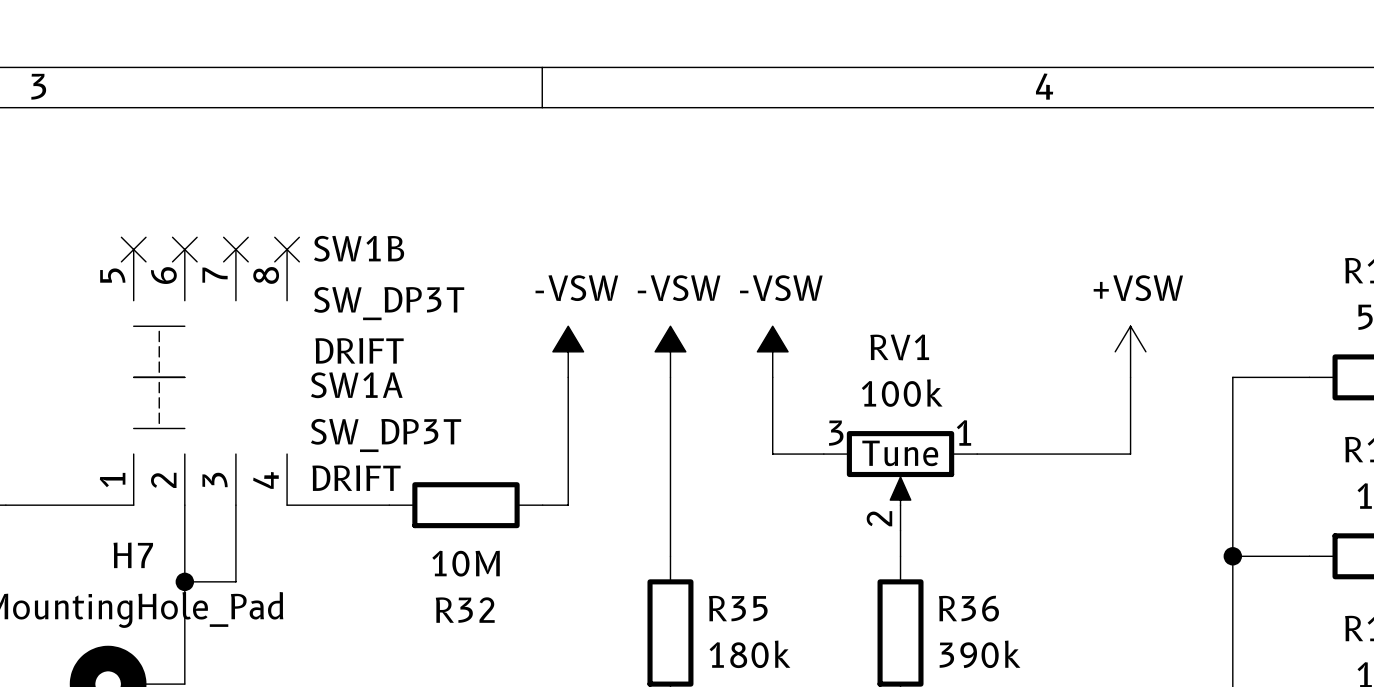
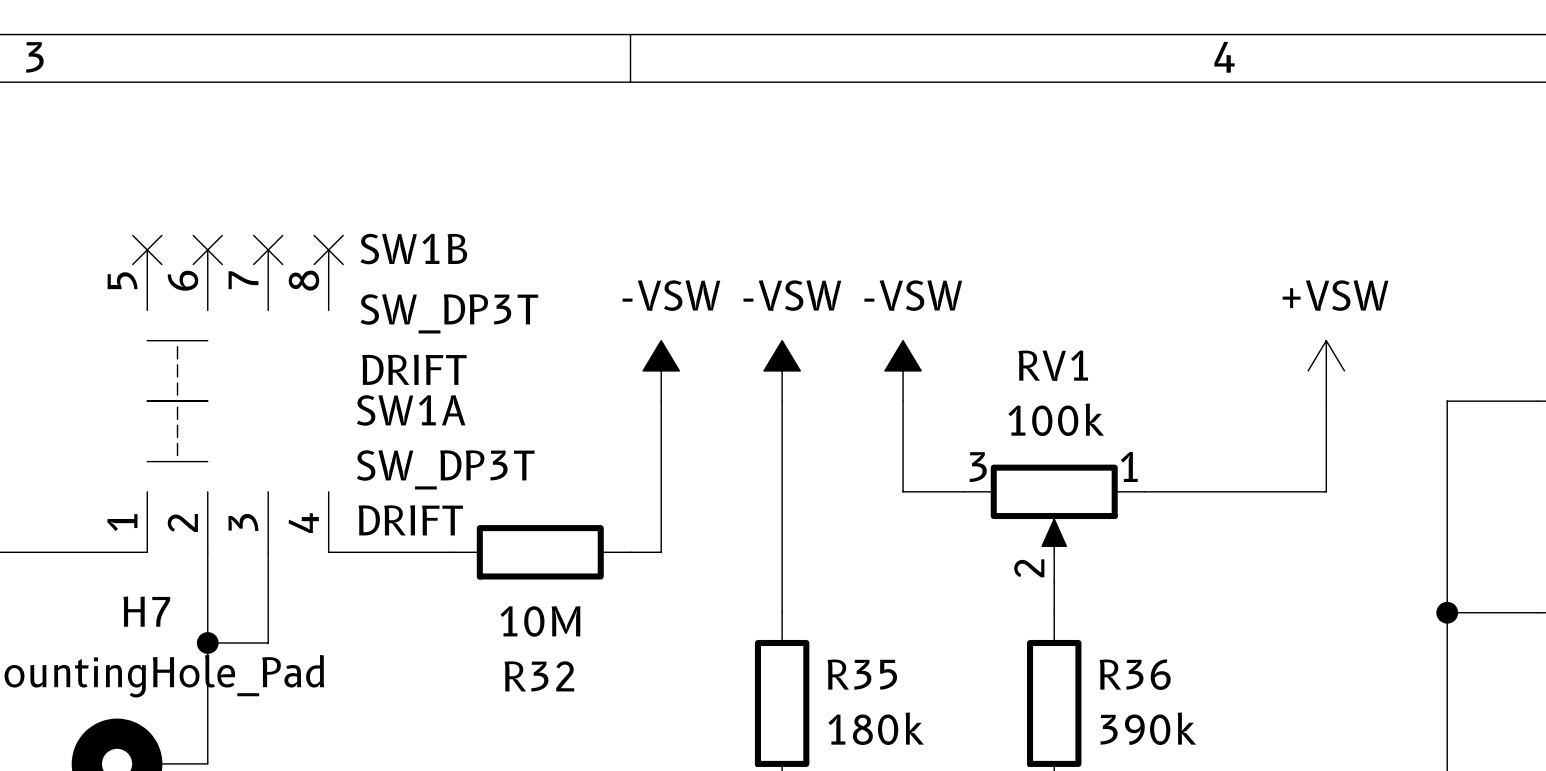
RV1 text: Tune (900, 453) -> none

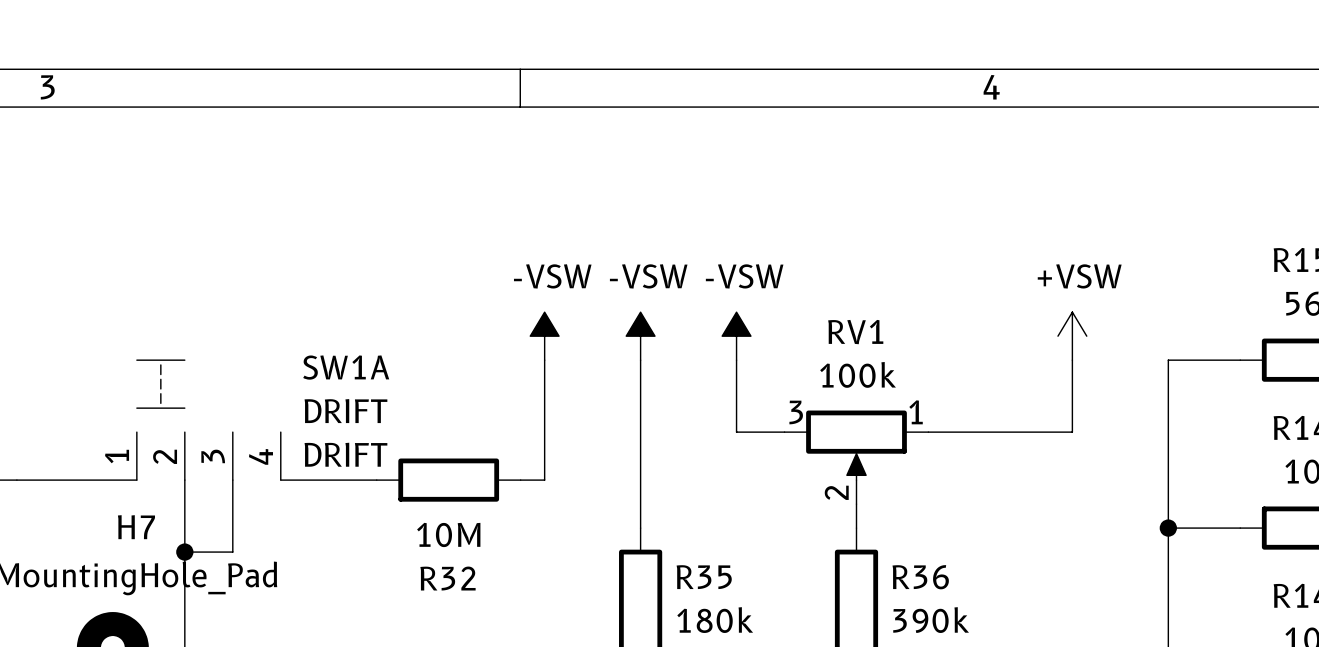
no-connect mark: (147, 249) -> none
no-connect mark: (207, 249) -> none
no-connect mark: (268, 249) -> none
no-connect mark: (328, 249) -> none
SW1B: SW_DP3T (237, 325) -> none
SW1A value: SW_DP3T (445, 469) -> DRIFT (345, 411)

